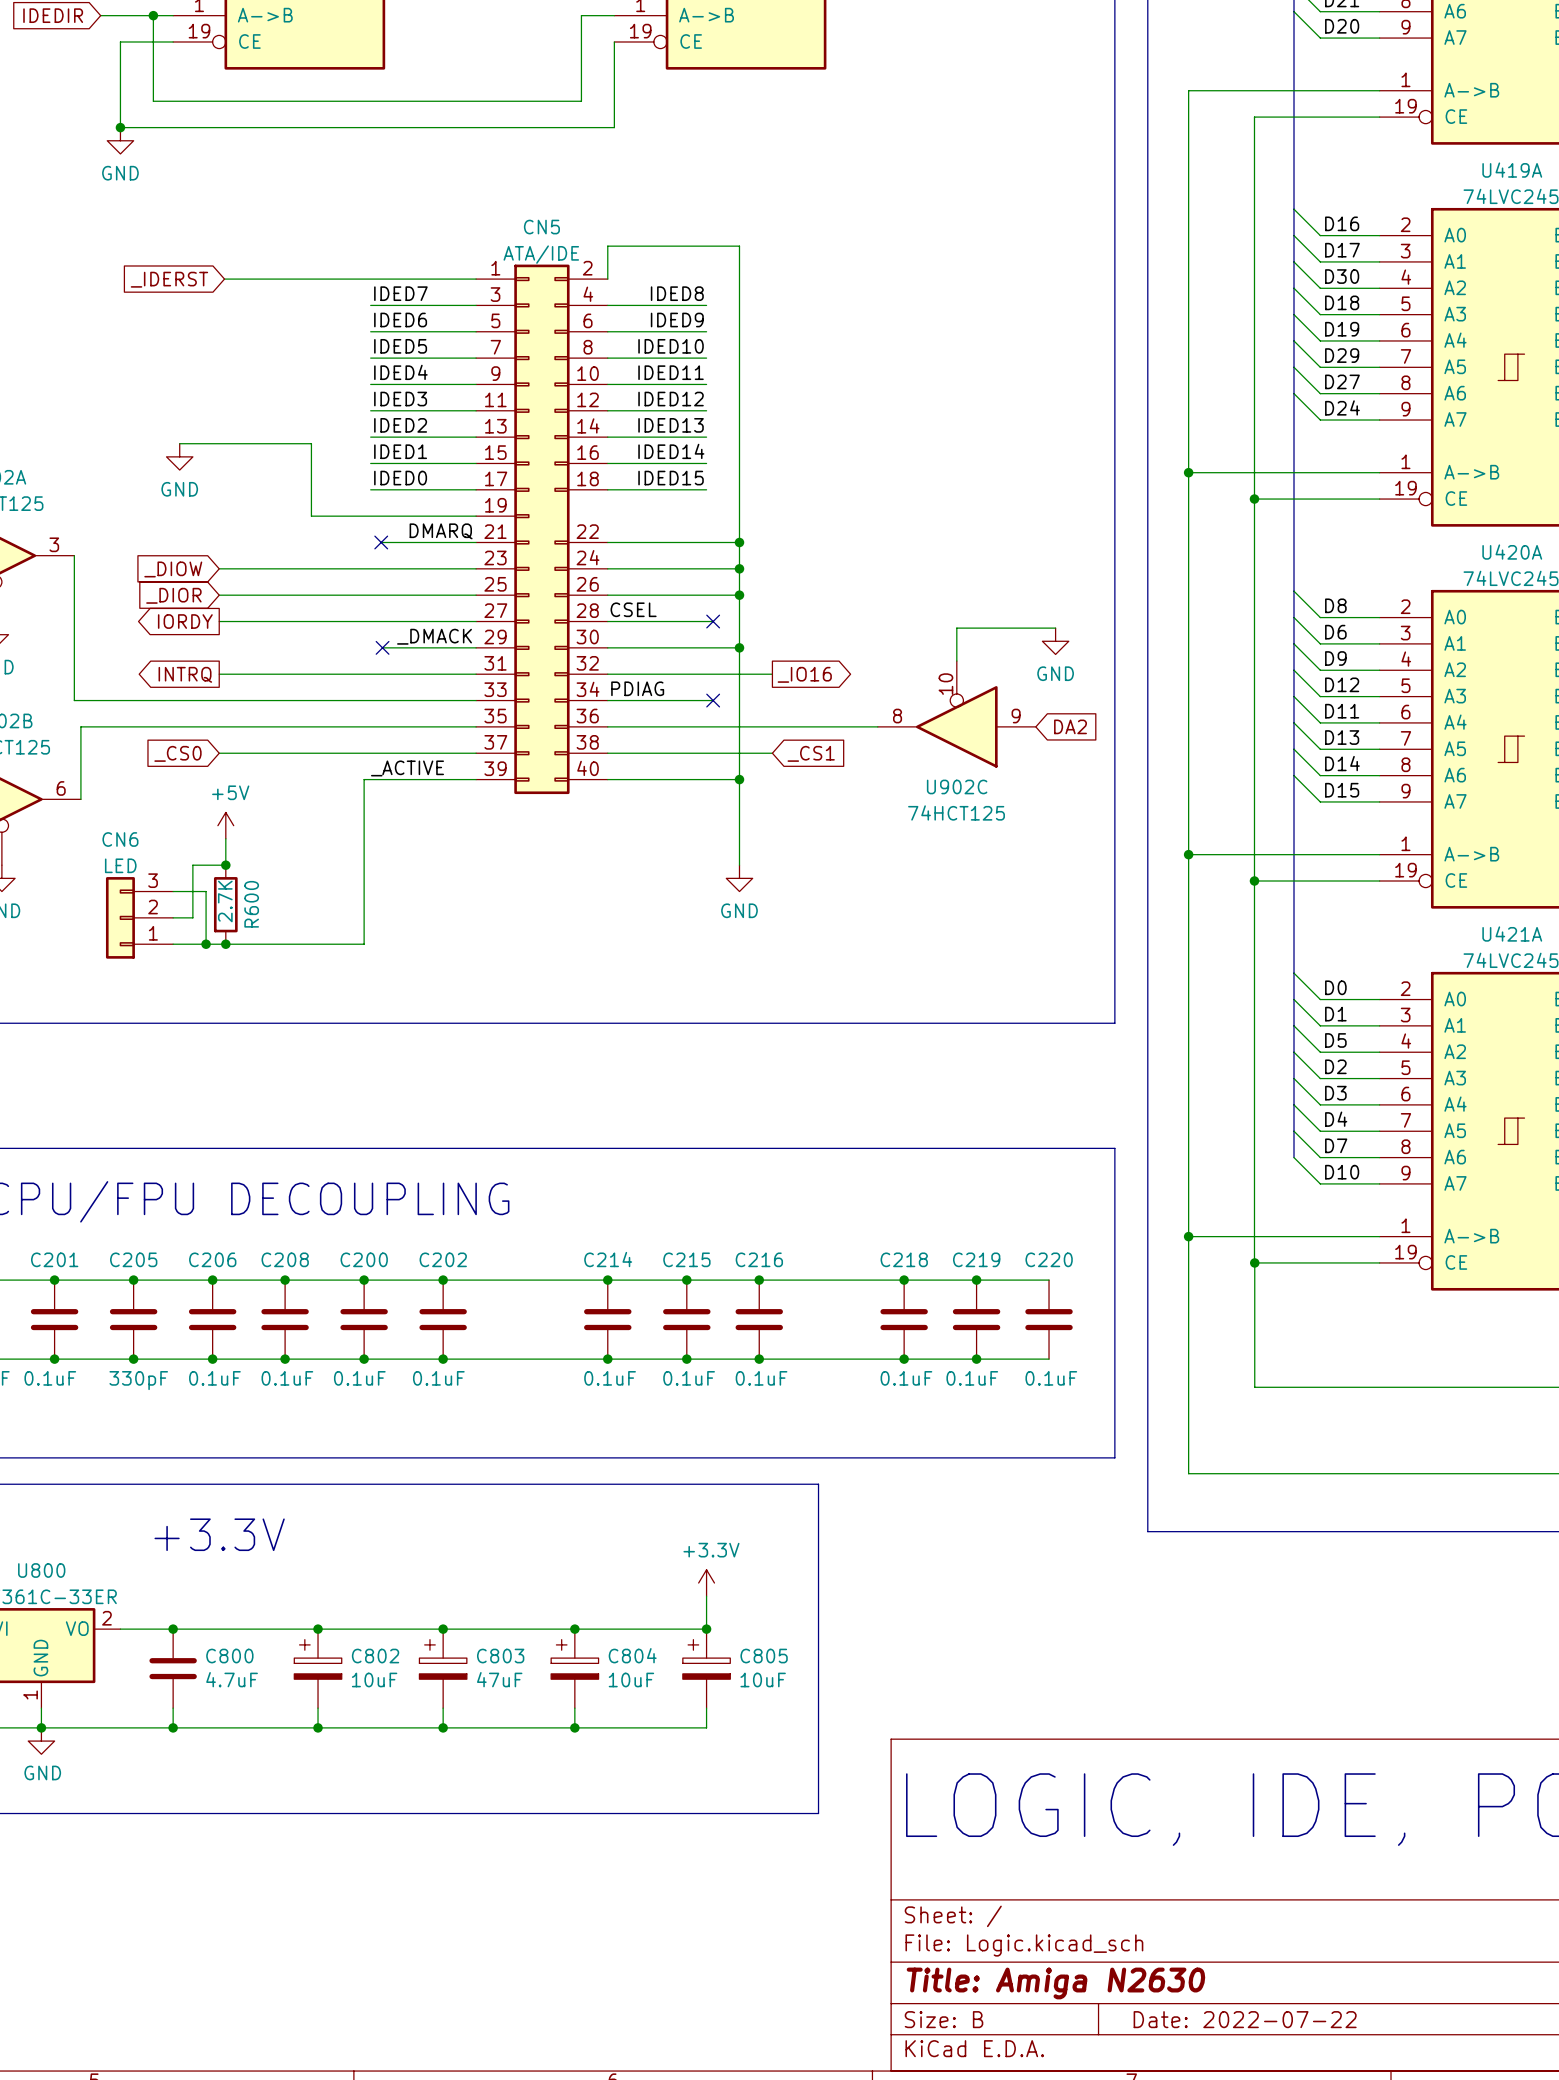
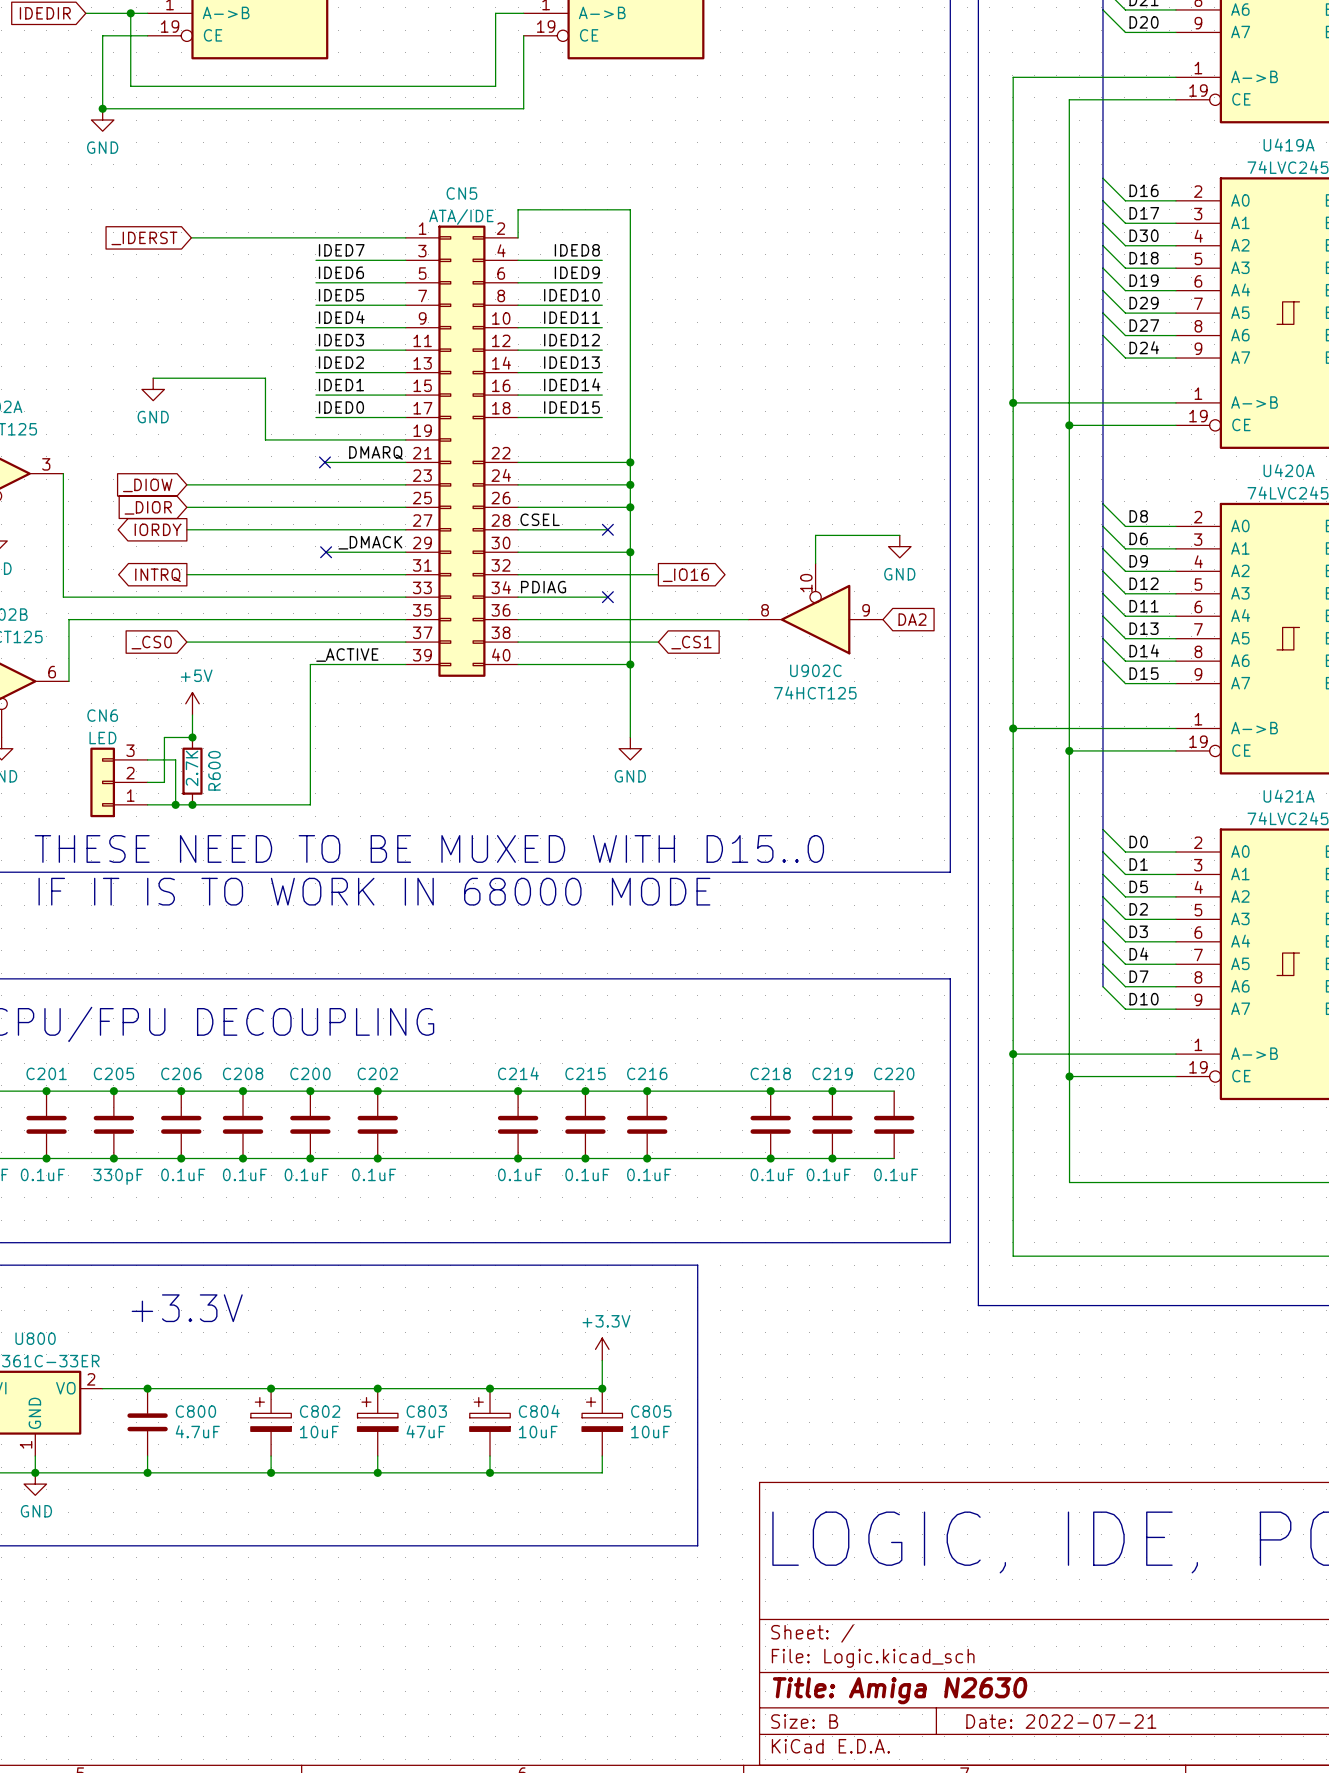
text: none -> THESE NEED TO BE MUXED WITH D15..0 (429, 848)
text: none -> IF IT IS TO WORK IN 68000 MODE (374, 891)
title block: Date: 2022-07-22 (1245, 2019) -> Date: 2022-07-21 (1061, 1721)

